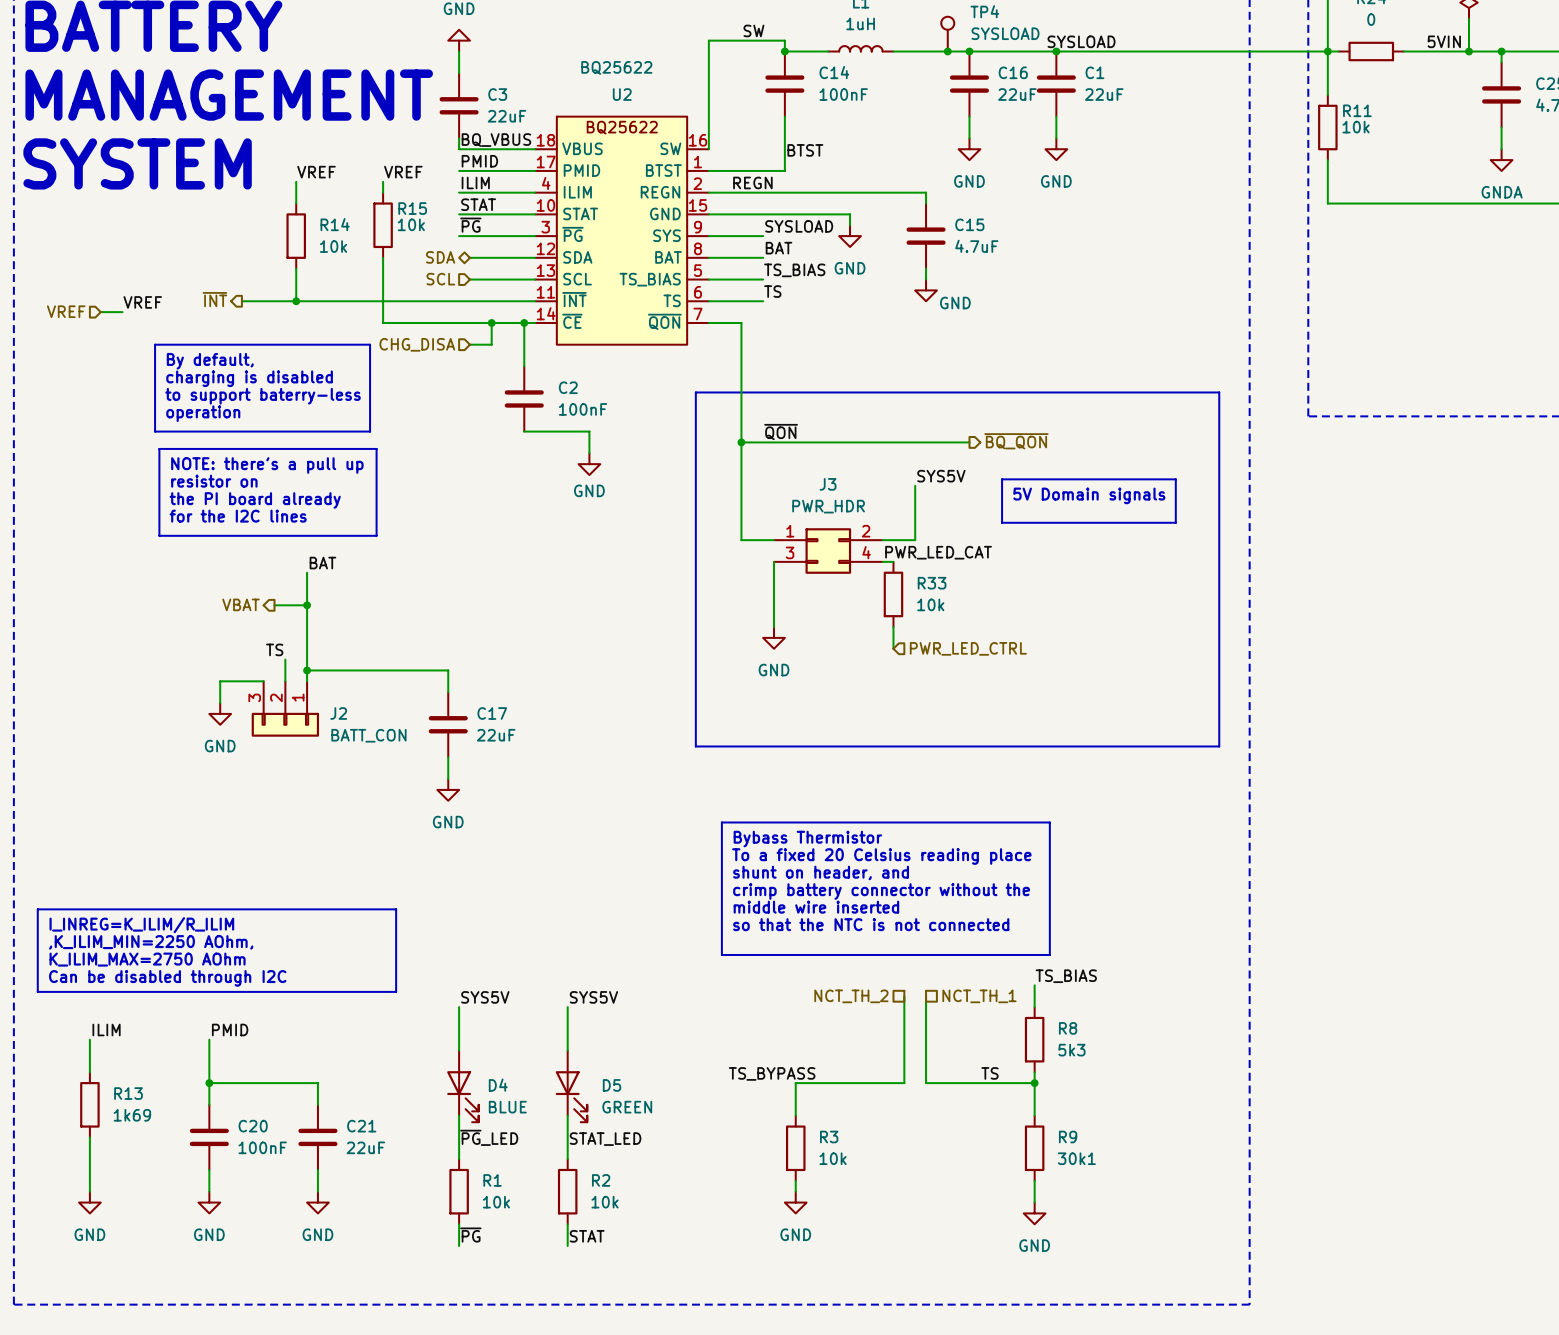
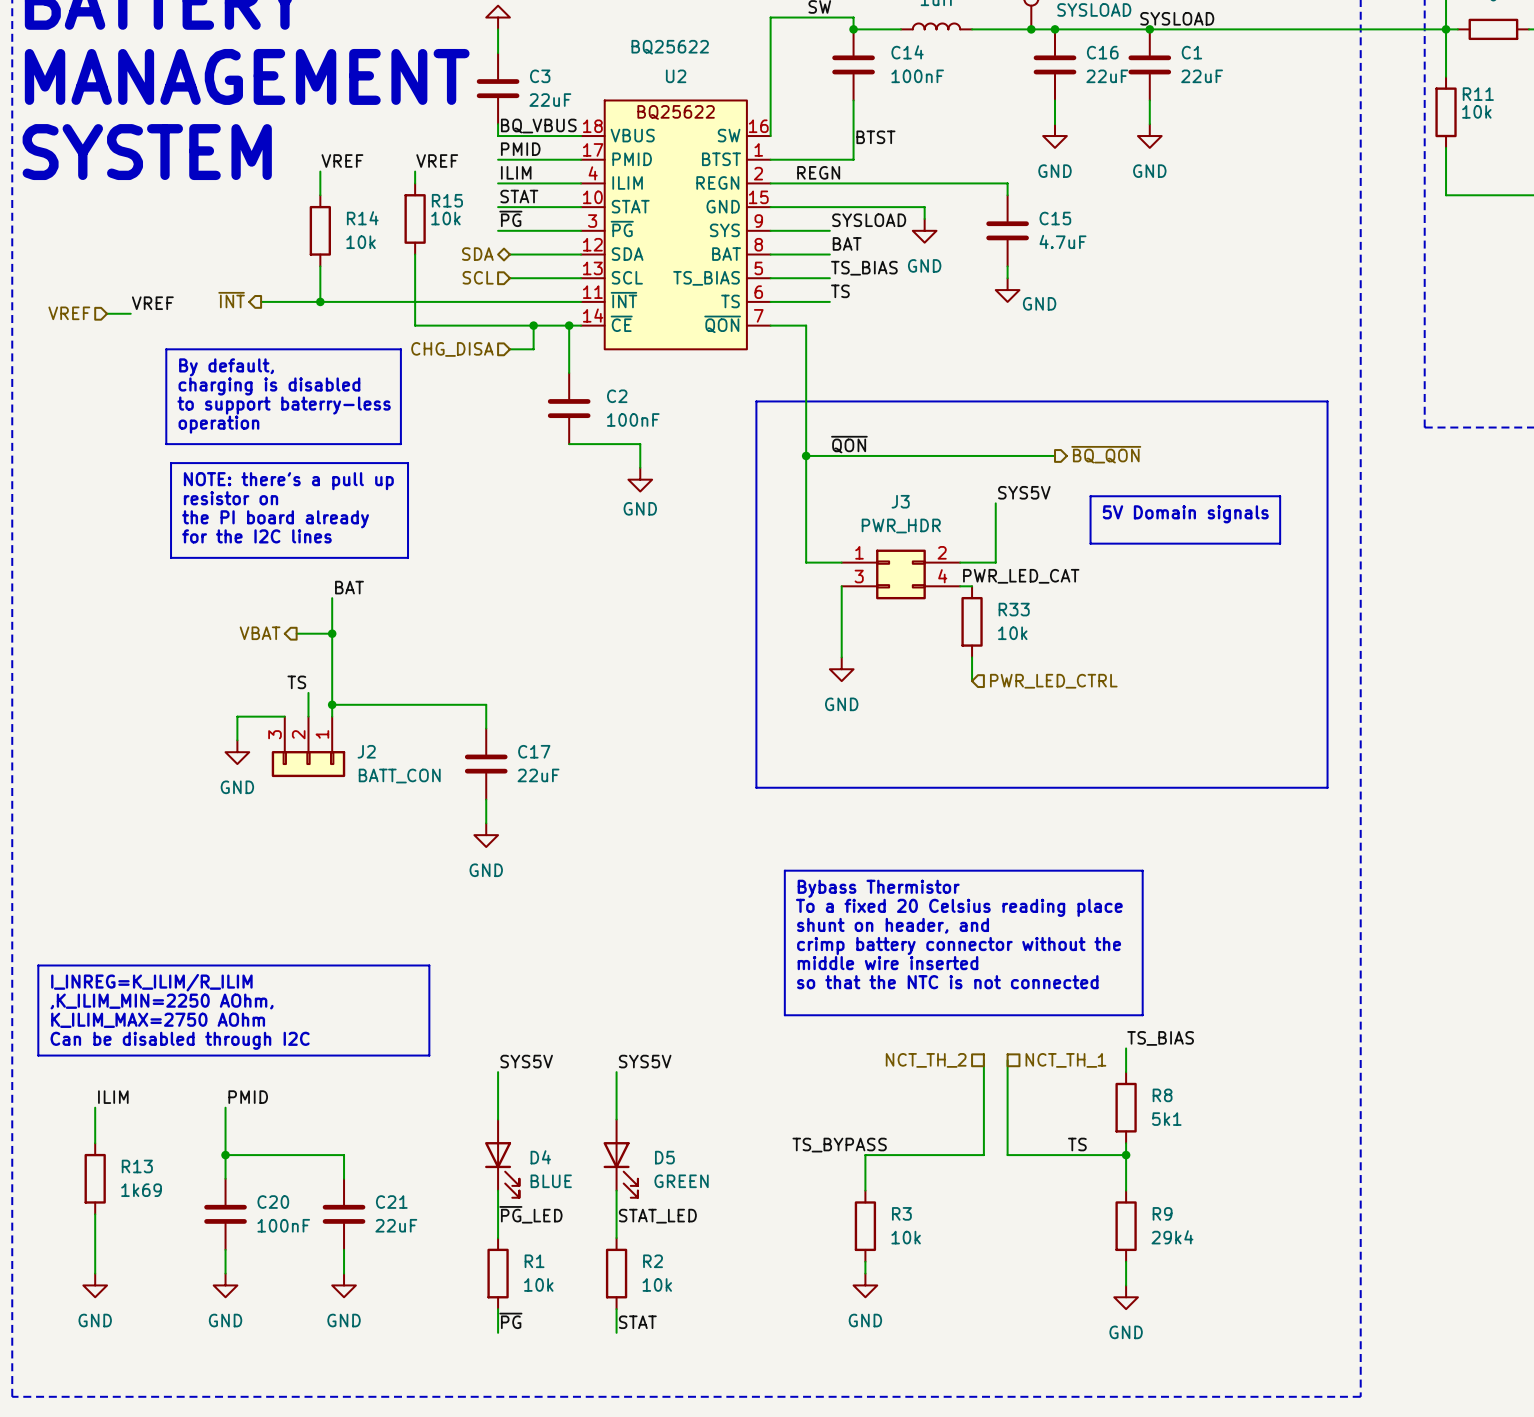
R8 value: 5k3 (1071, 1050) -> 5k1 (1166, 1119)
R9 value: 30k1 (1076, 1158) -> 29k4 (1172, 1237)

